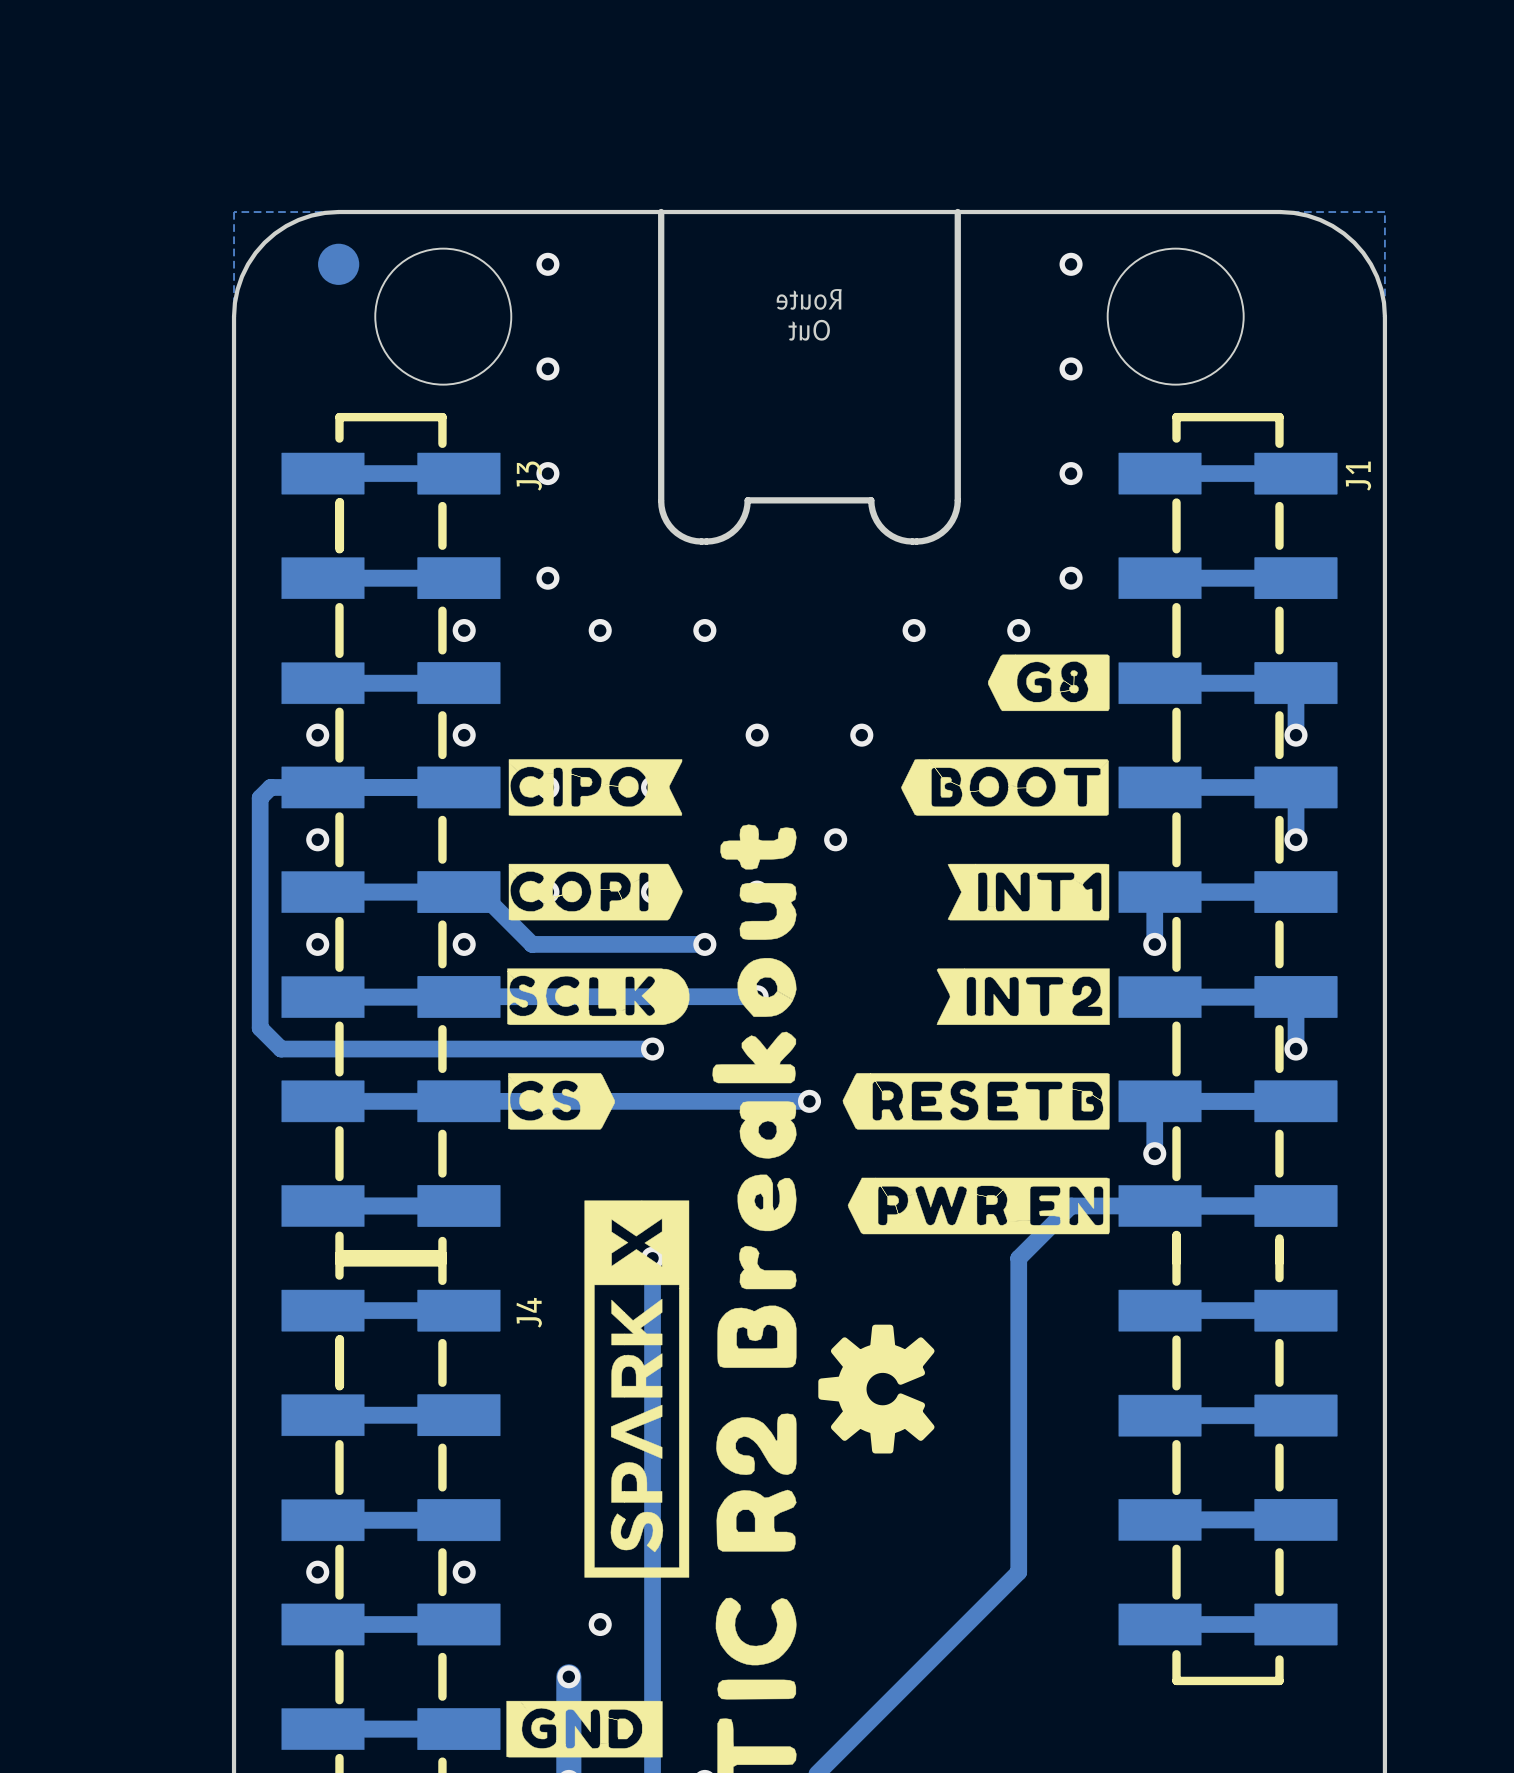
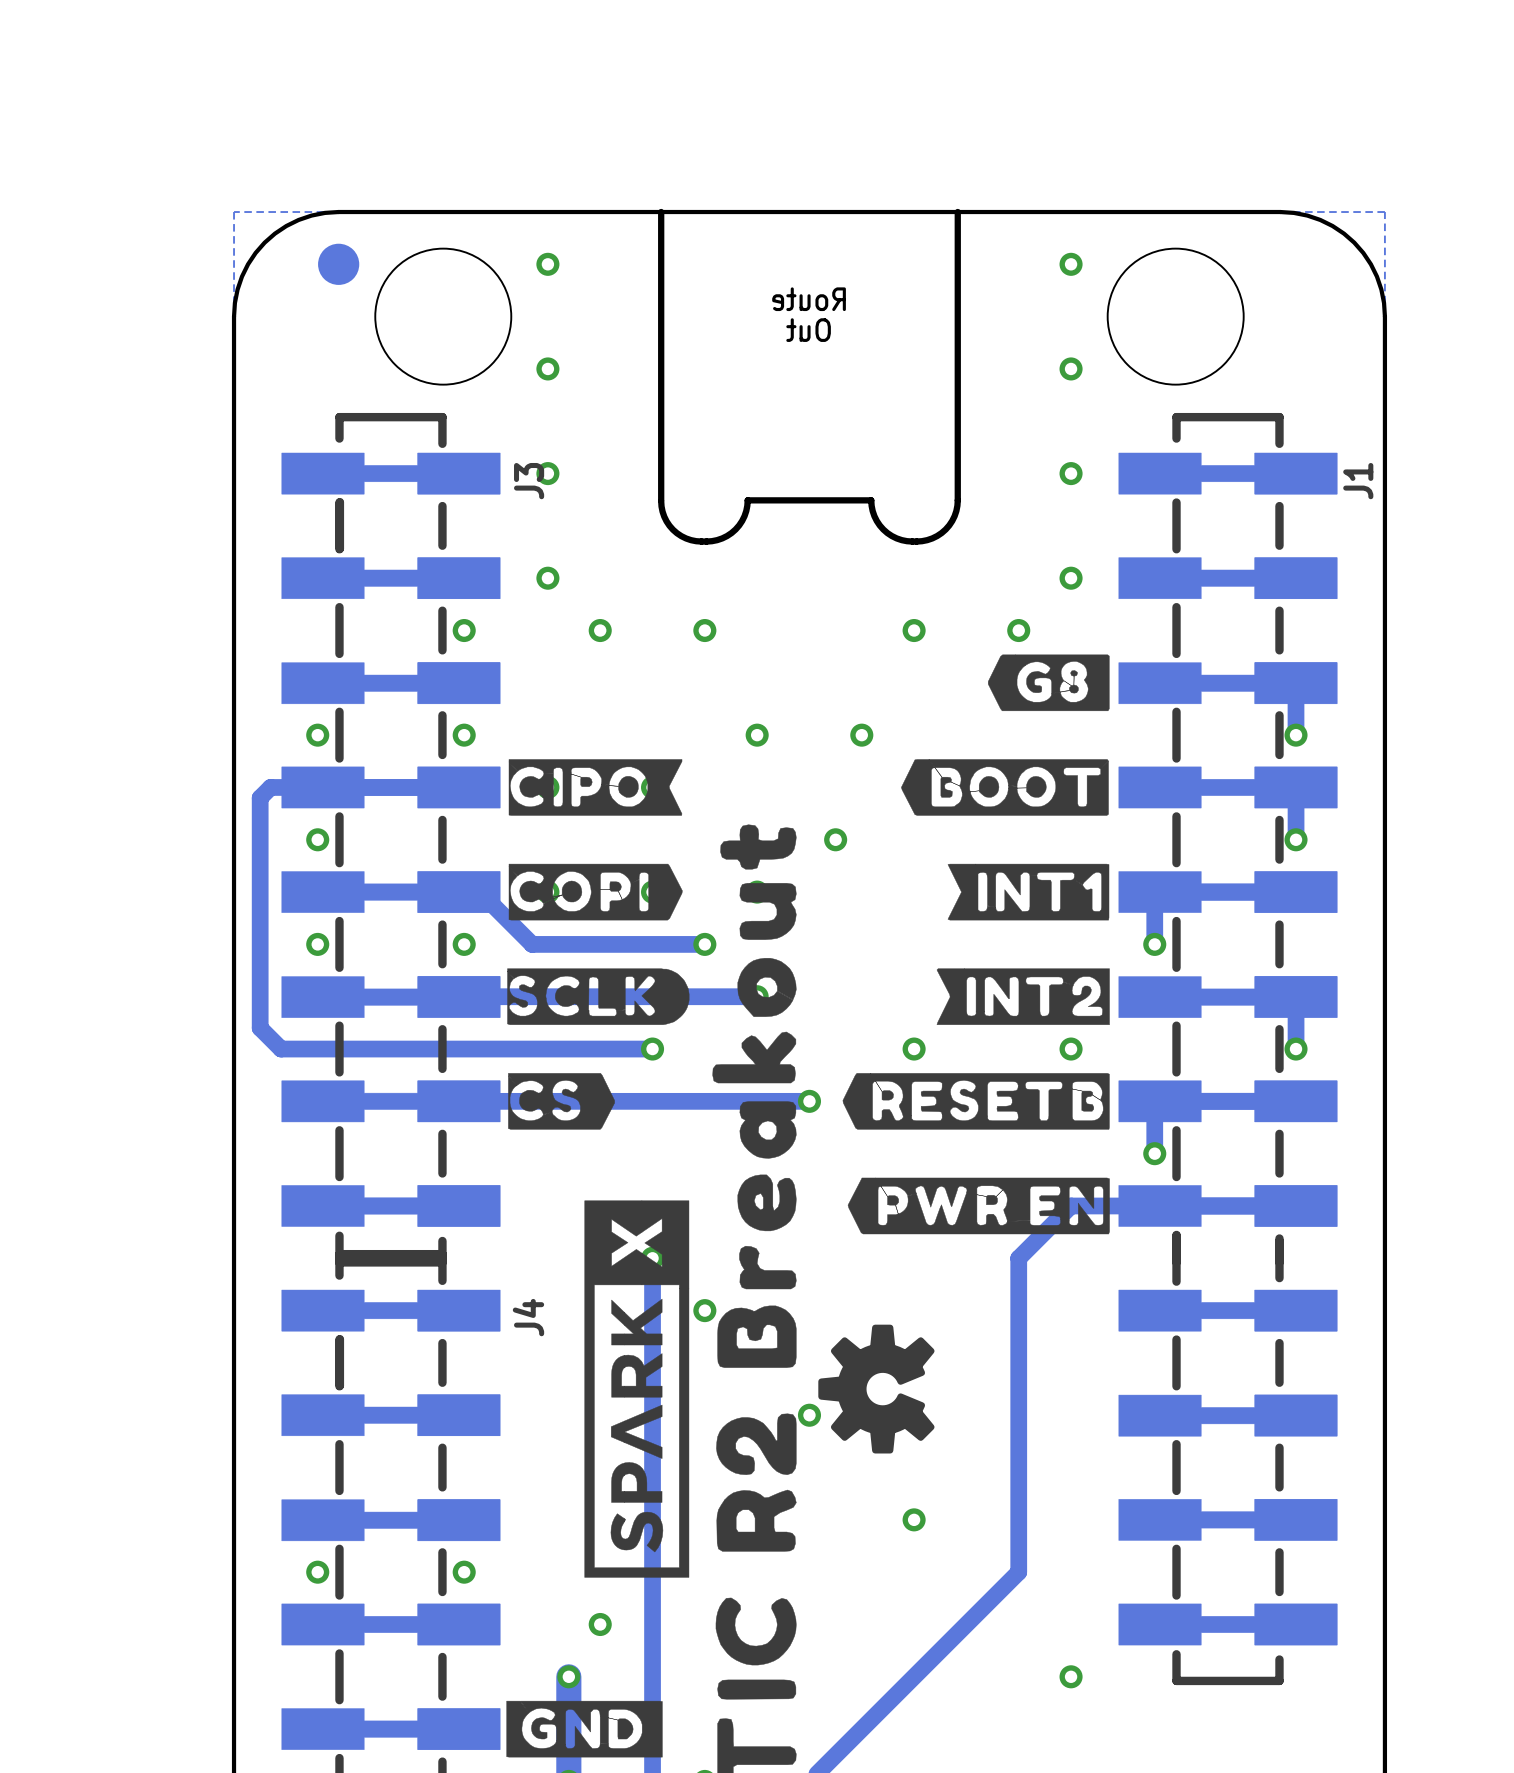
via: none -> (914, 1049)
via: none -> (1071, 1049)
via: none -> (704, 1310)
via: none -> (809, 1415)
via: none -> (914, 1519)
via: none -> (1071, 1676)

